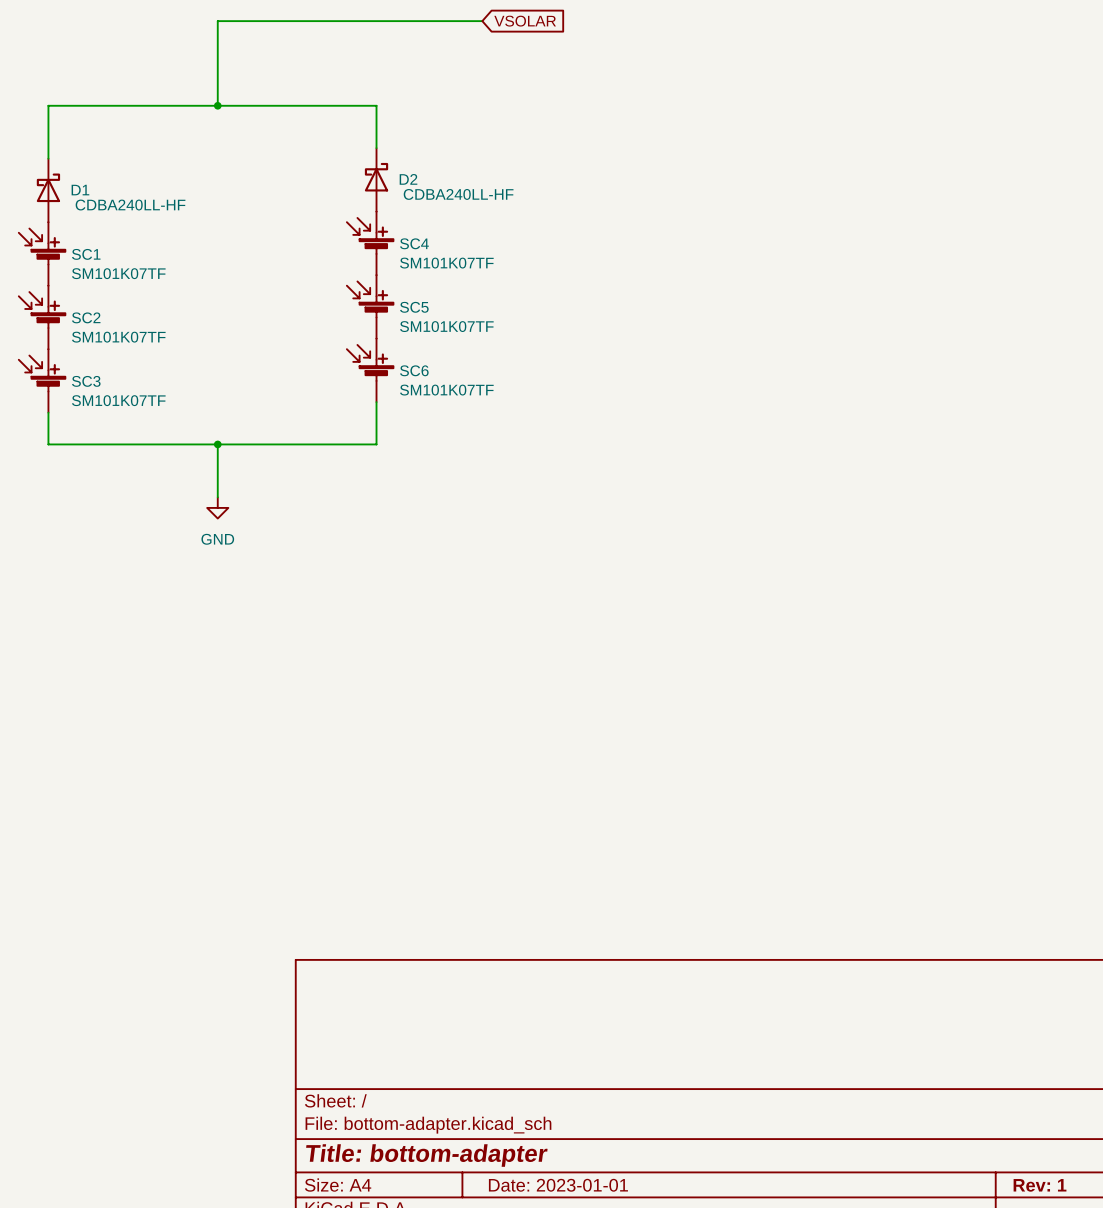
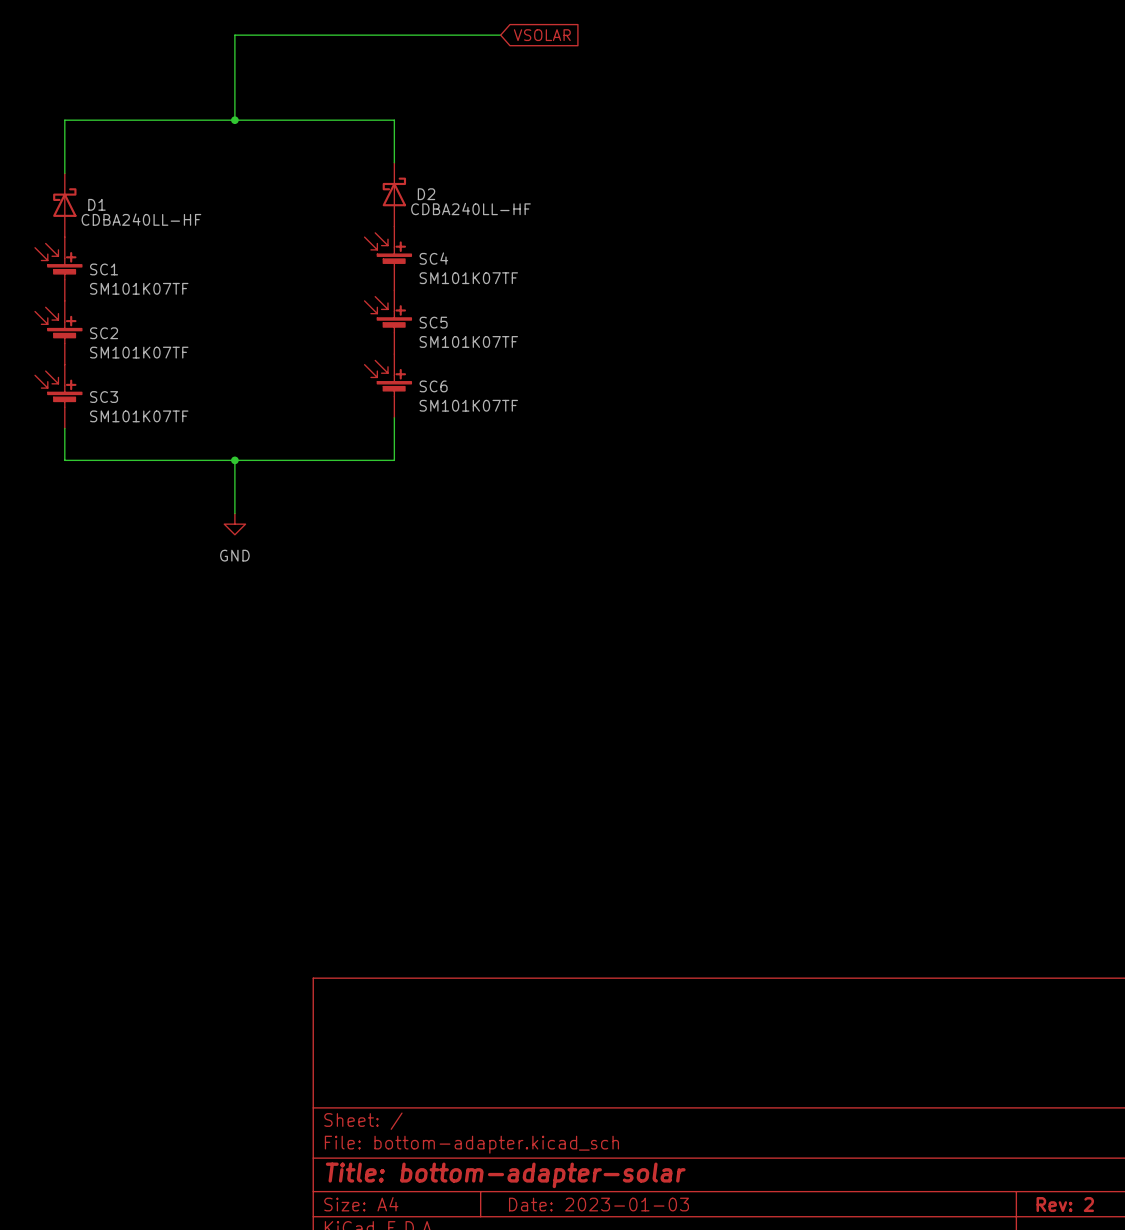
title block: Title: bottom-adapter (426, 1155) -> Title: bottom-adapter-solar (505, 1175)
title block: Date: 2023-01-01 (558, 1185) -> Date: 2023-01-03 (598, 1204)
title block: Rev: 1 (1040, 1185) -> Rev: 2 (1065, 1204)

